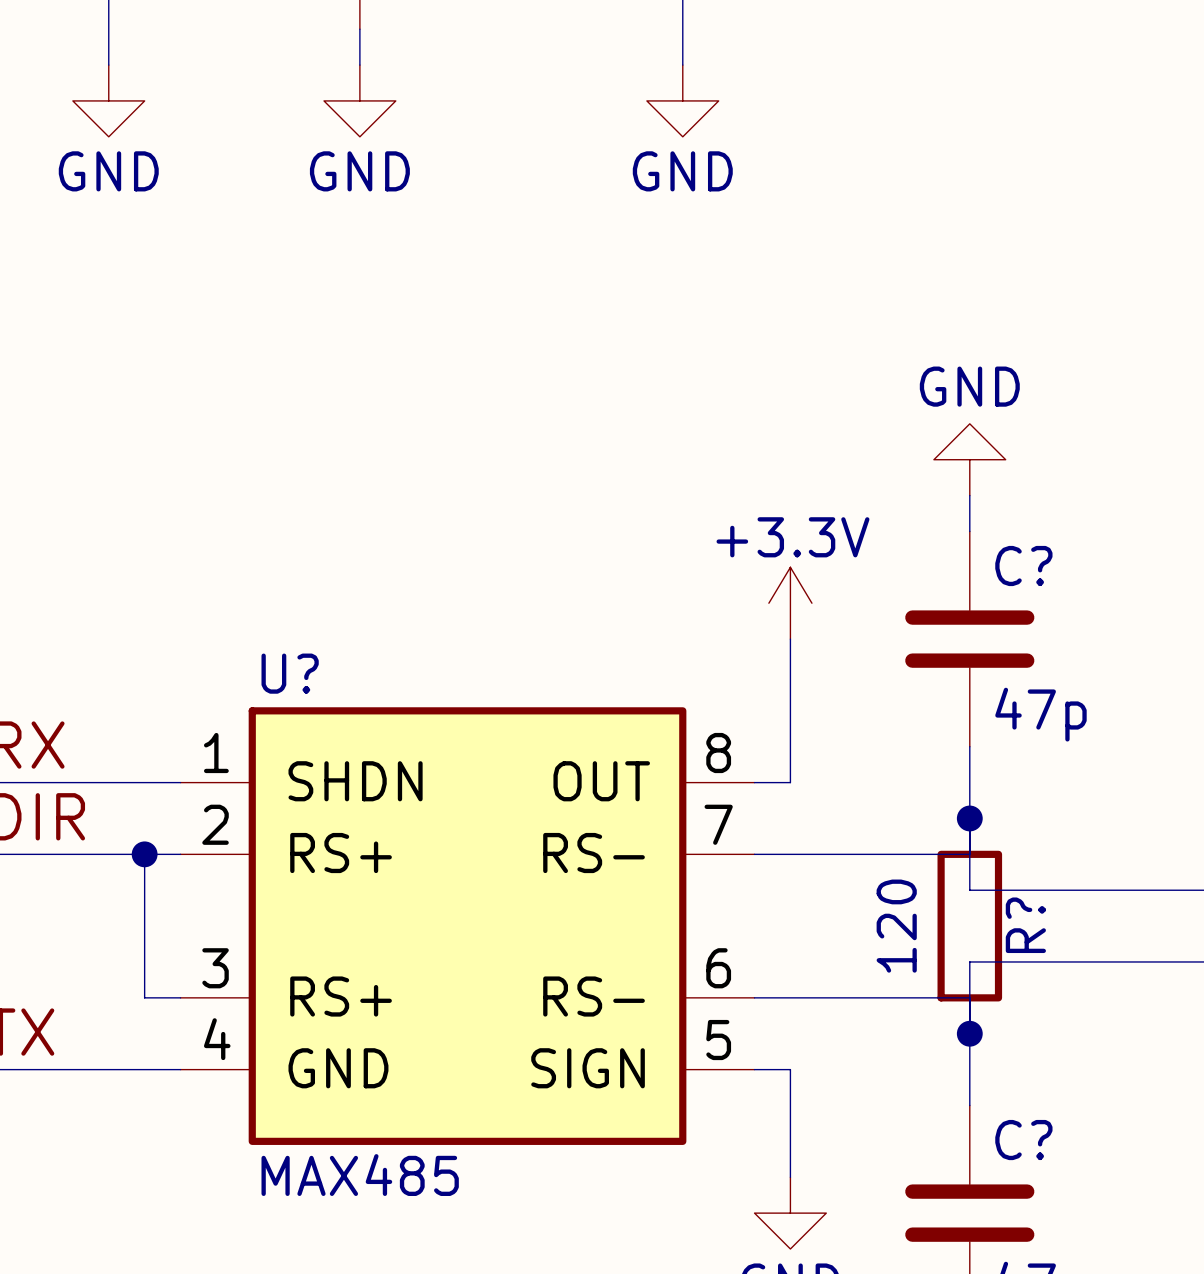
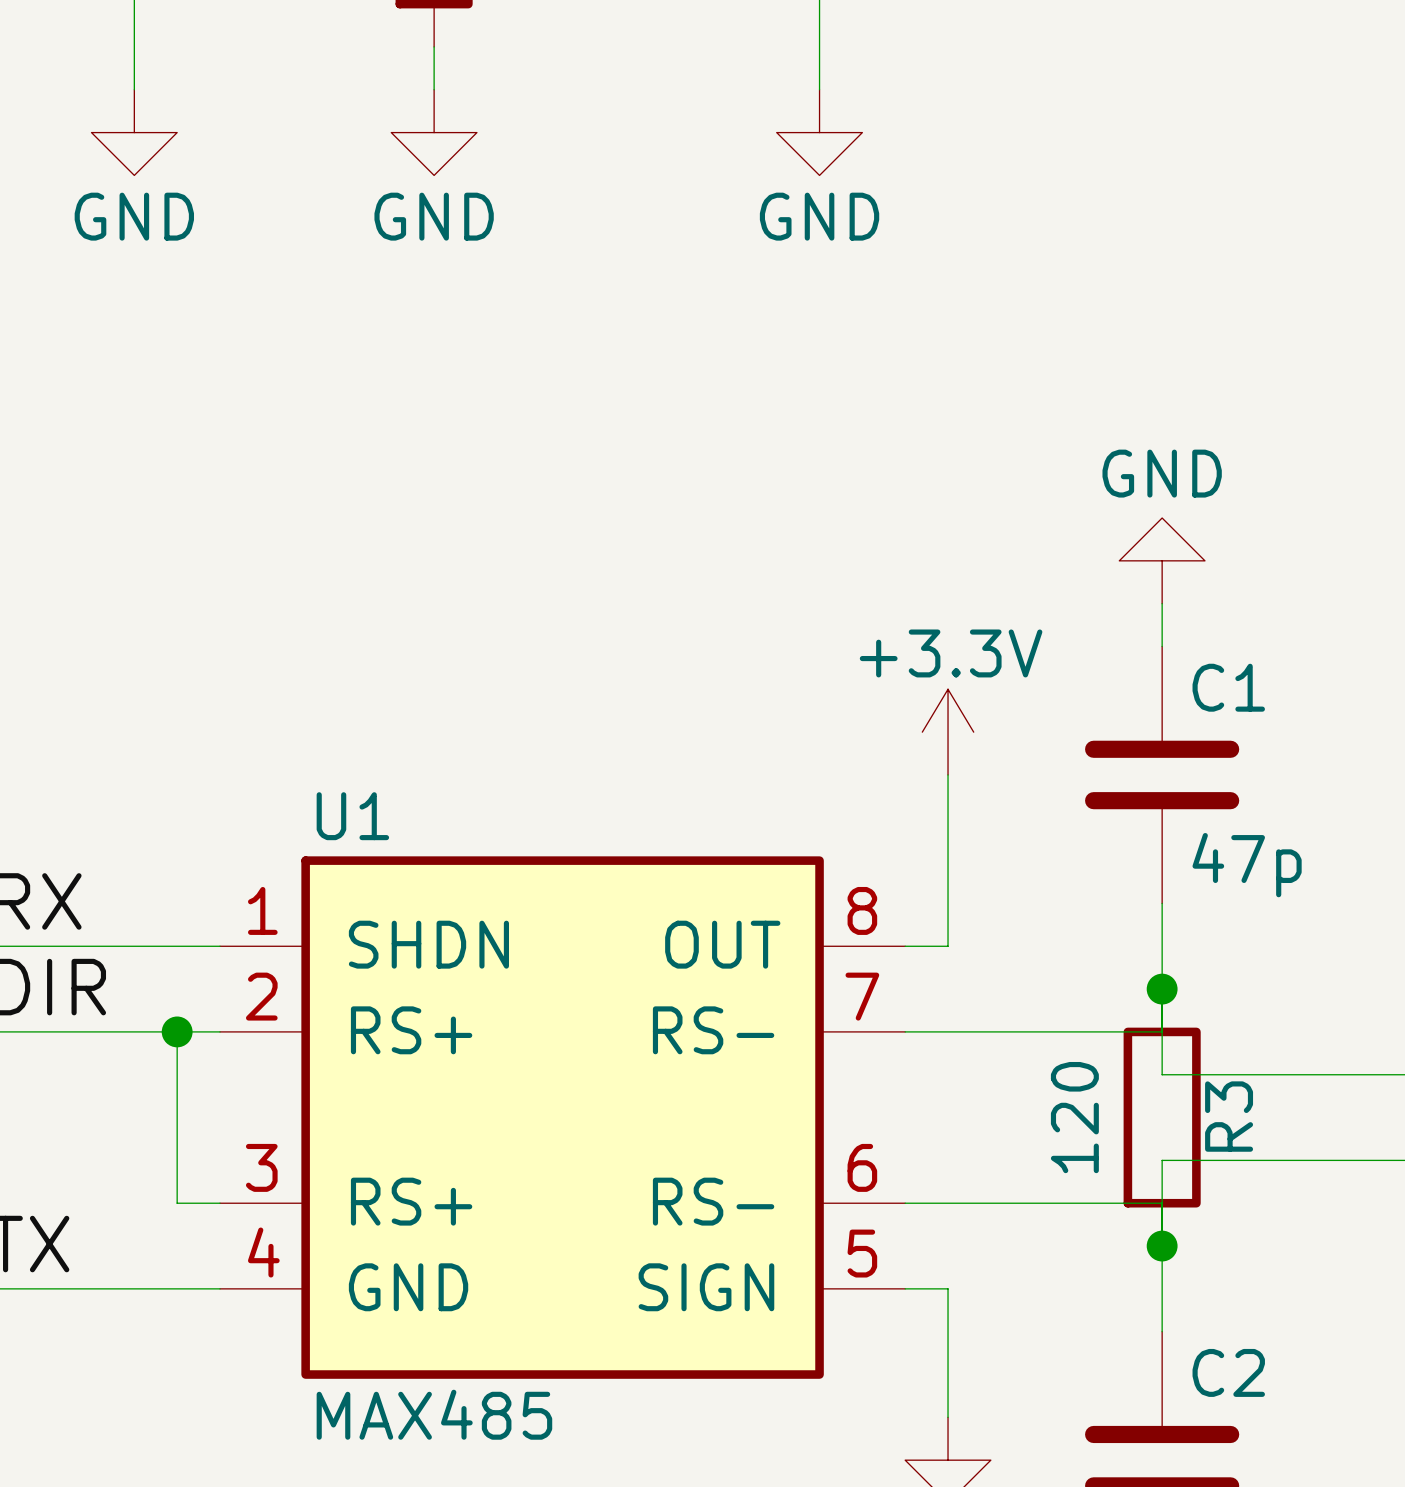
C? name: C? (1023, 566) -> C1 (1228, 687)
U? name: U? (290, 673) -> U1 (352, 816)
R? name: R? (1025, 925) -> R3 (1229, 1116)
C? name: C? (1023, 1140) -> C2 (1228, 1372)

